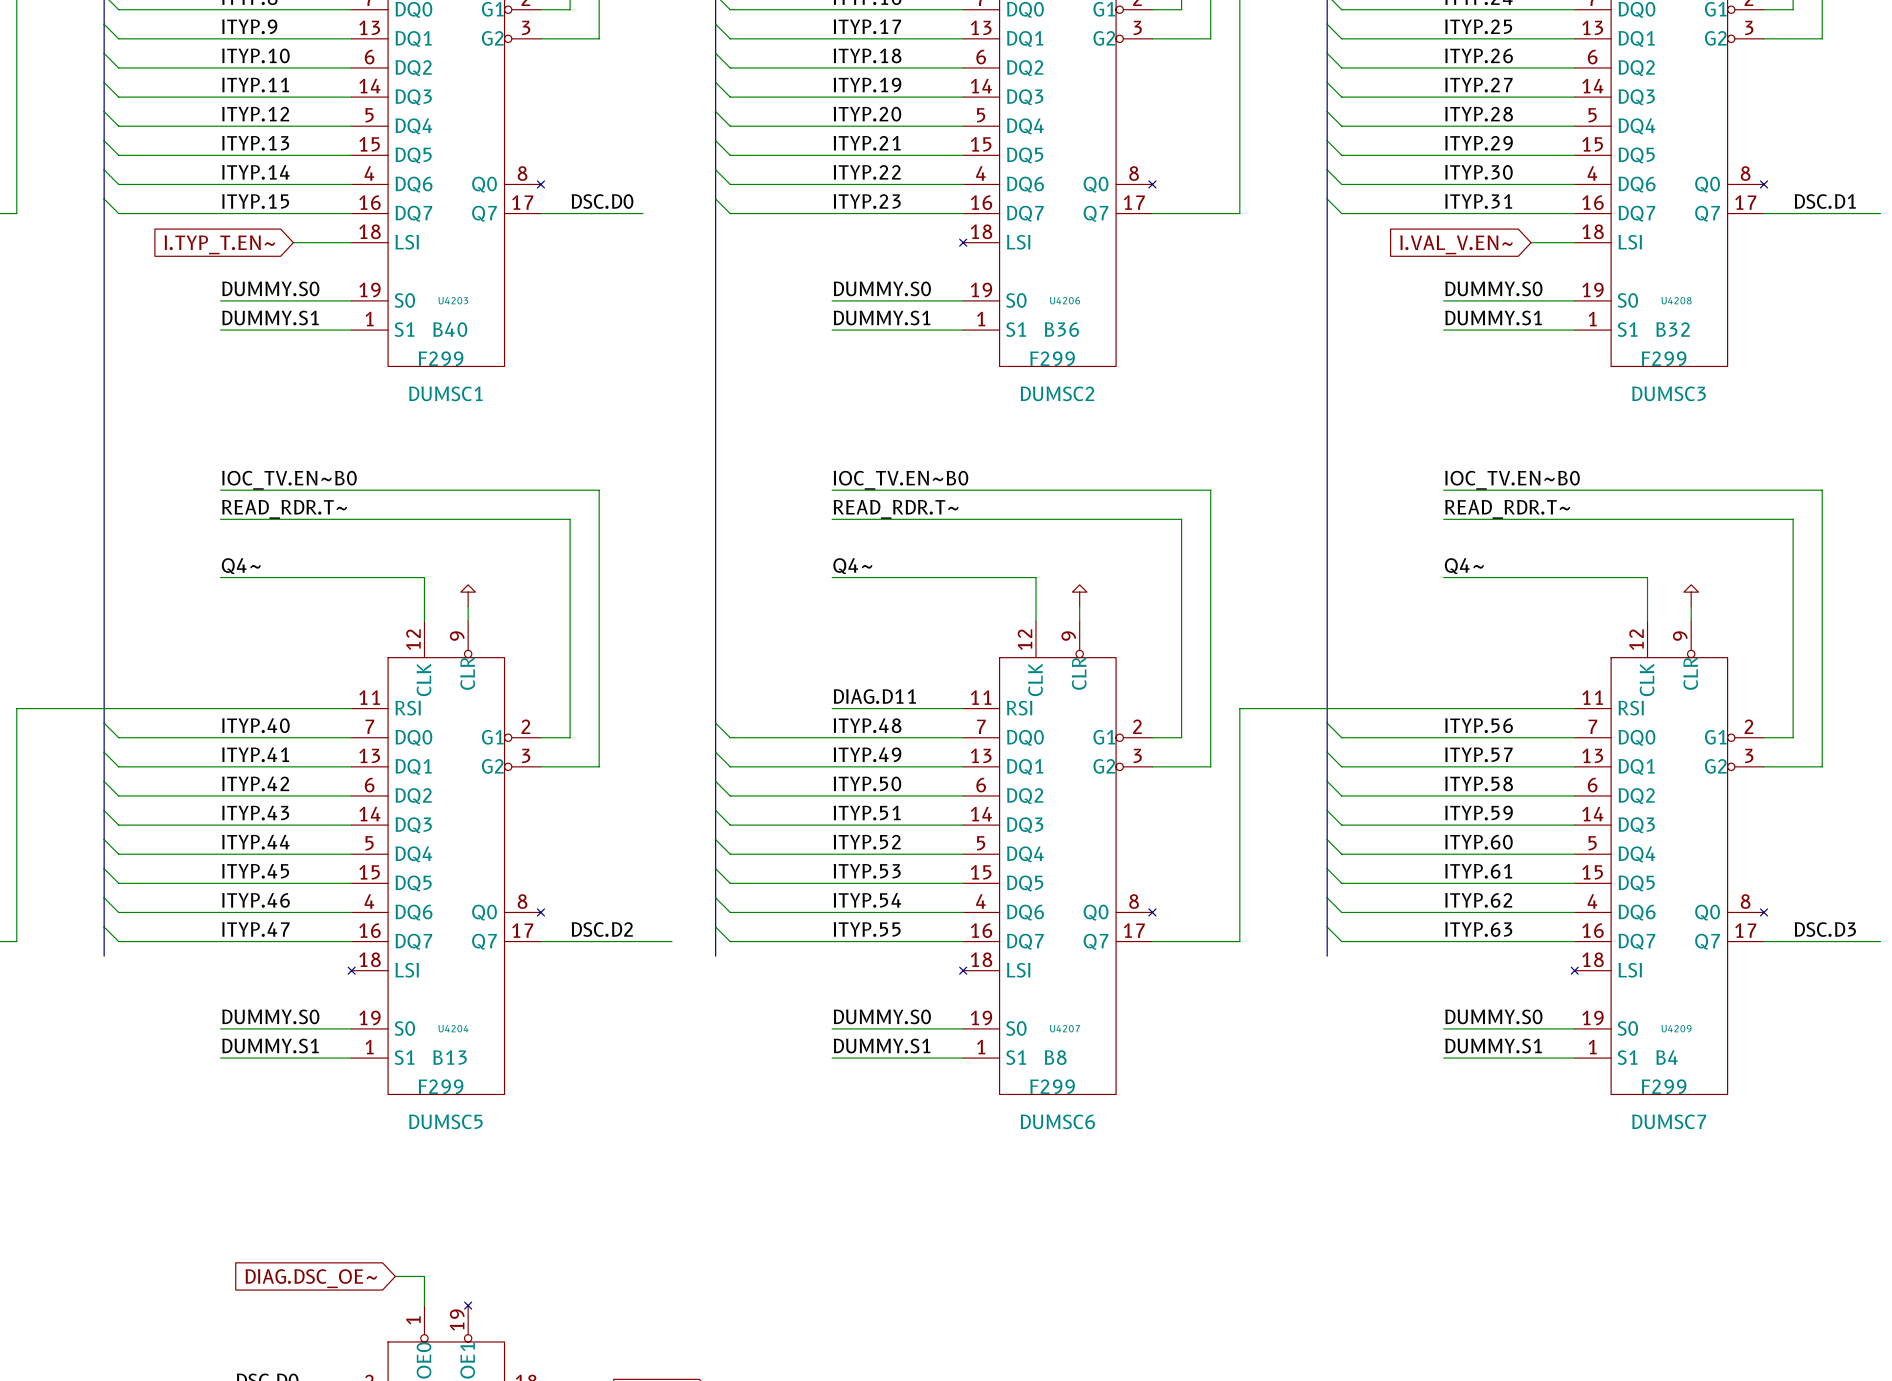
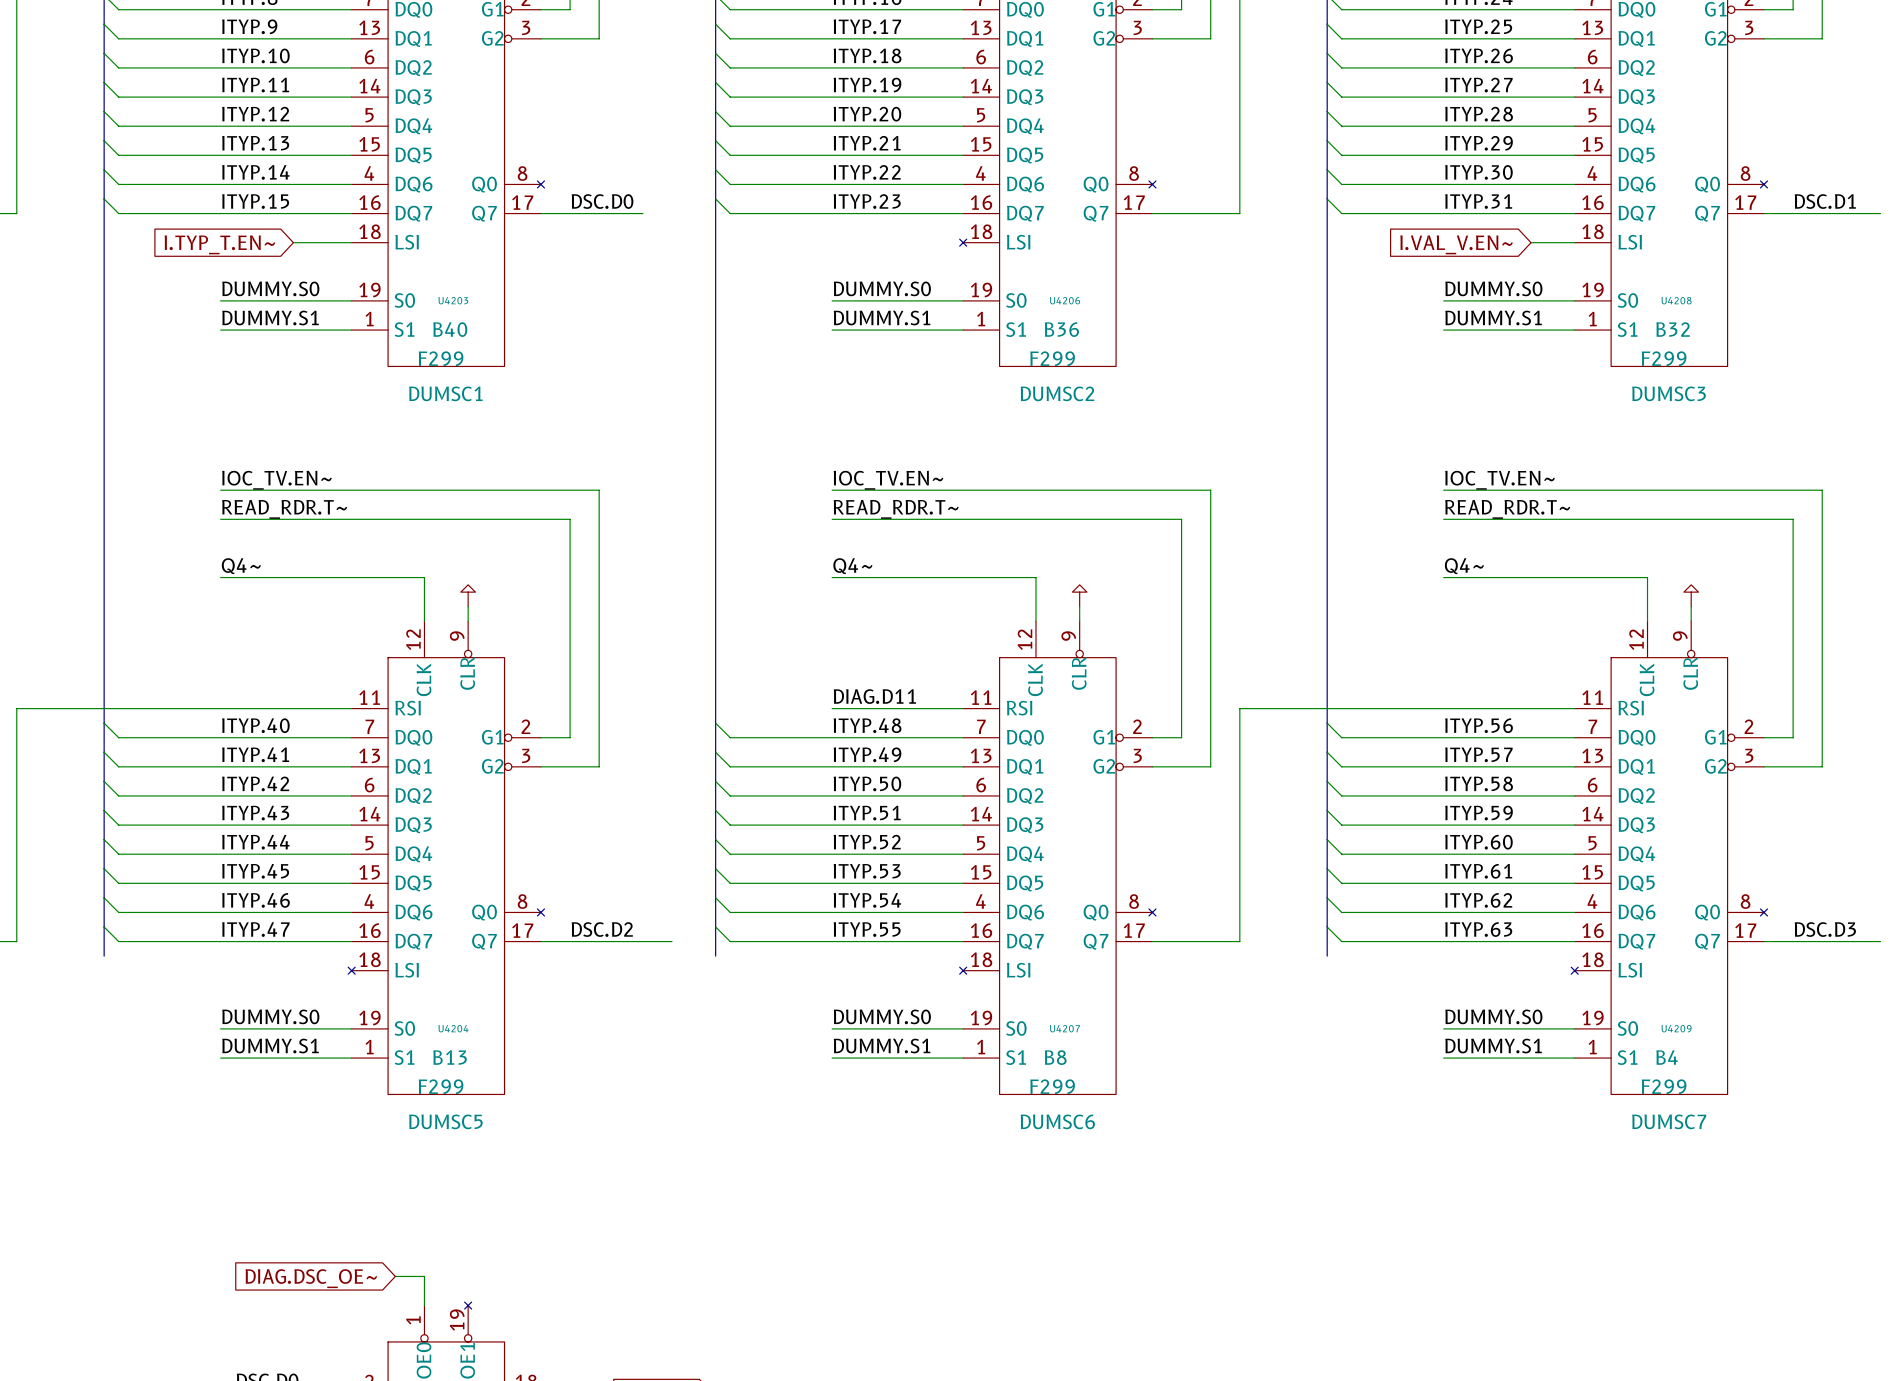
label: IOC_TV.EN~B0 (289, 480) -> IOC_TV.EN~ (276, 480)
label: IOC_TV.EN~B0 (900, 480) -> IOC_TV.EN~ (888, 480)
label: IOC_TV.EN~B0 (1512, 480) -> IOC_TV.EN~ (1500, 480)

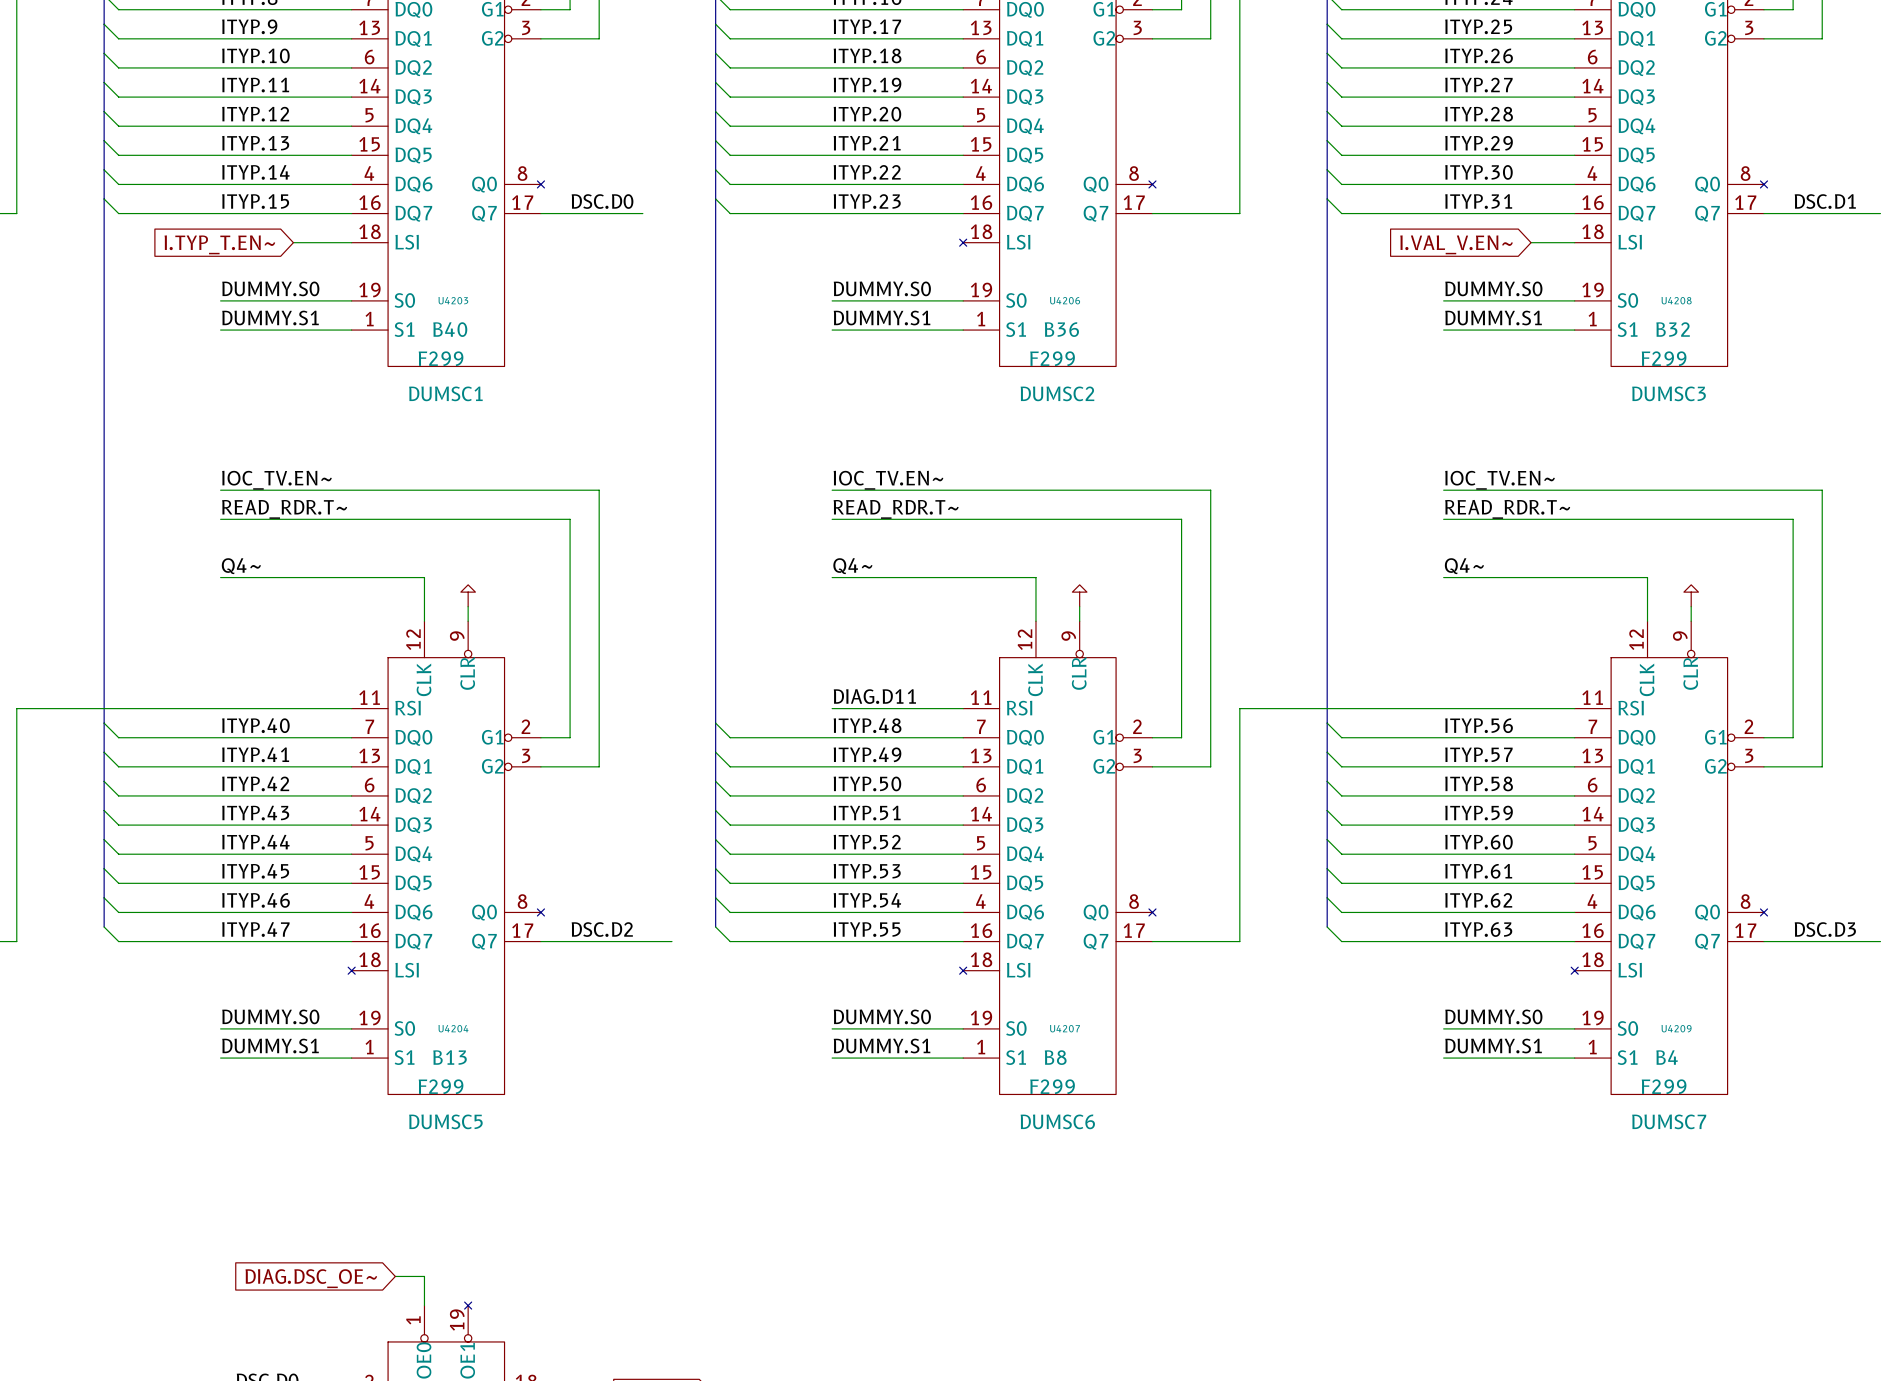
bus: (104, 927) (104, 956) -> none
bus: (715, 927) (715, 956) -> none
bus: (1327, 927) (1327, 956) -> none

